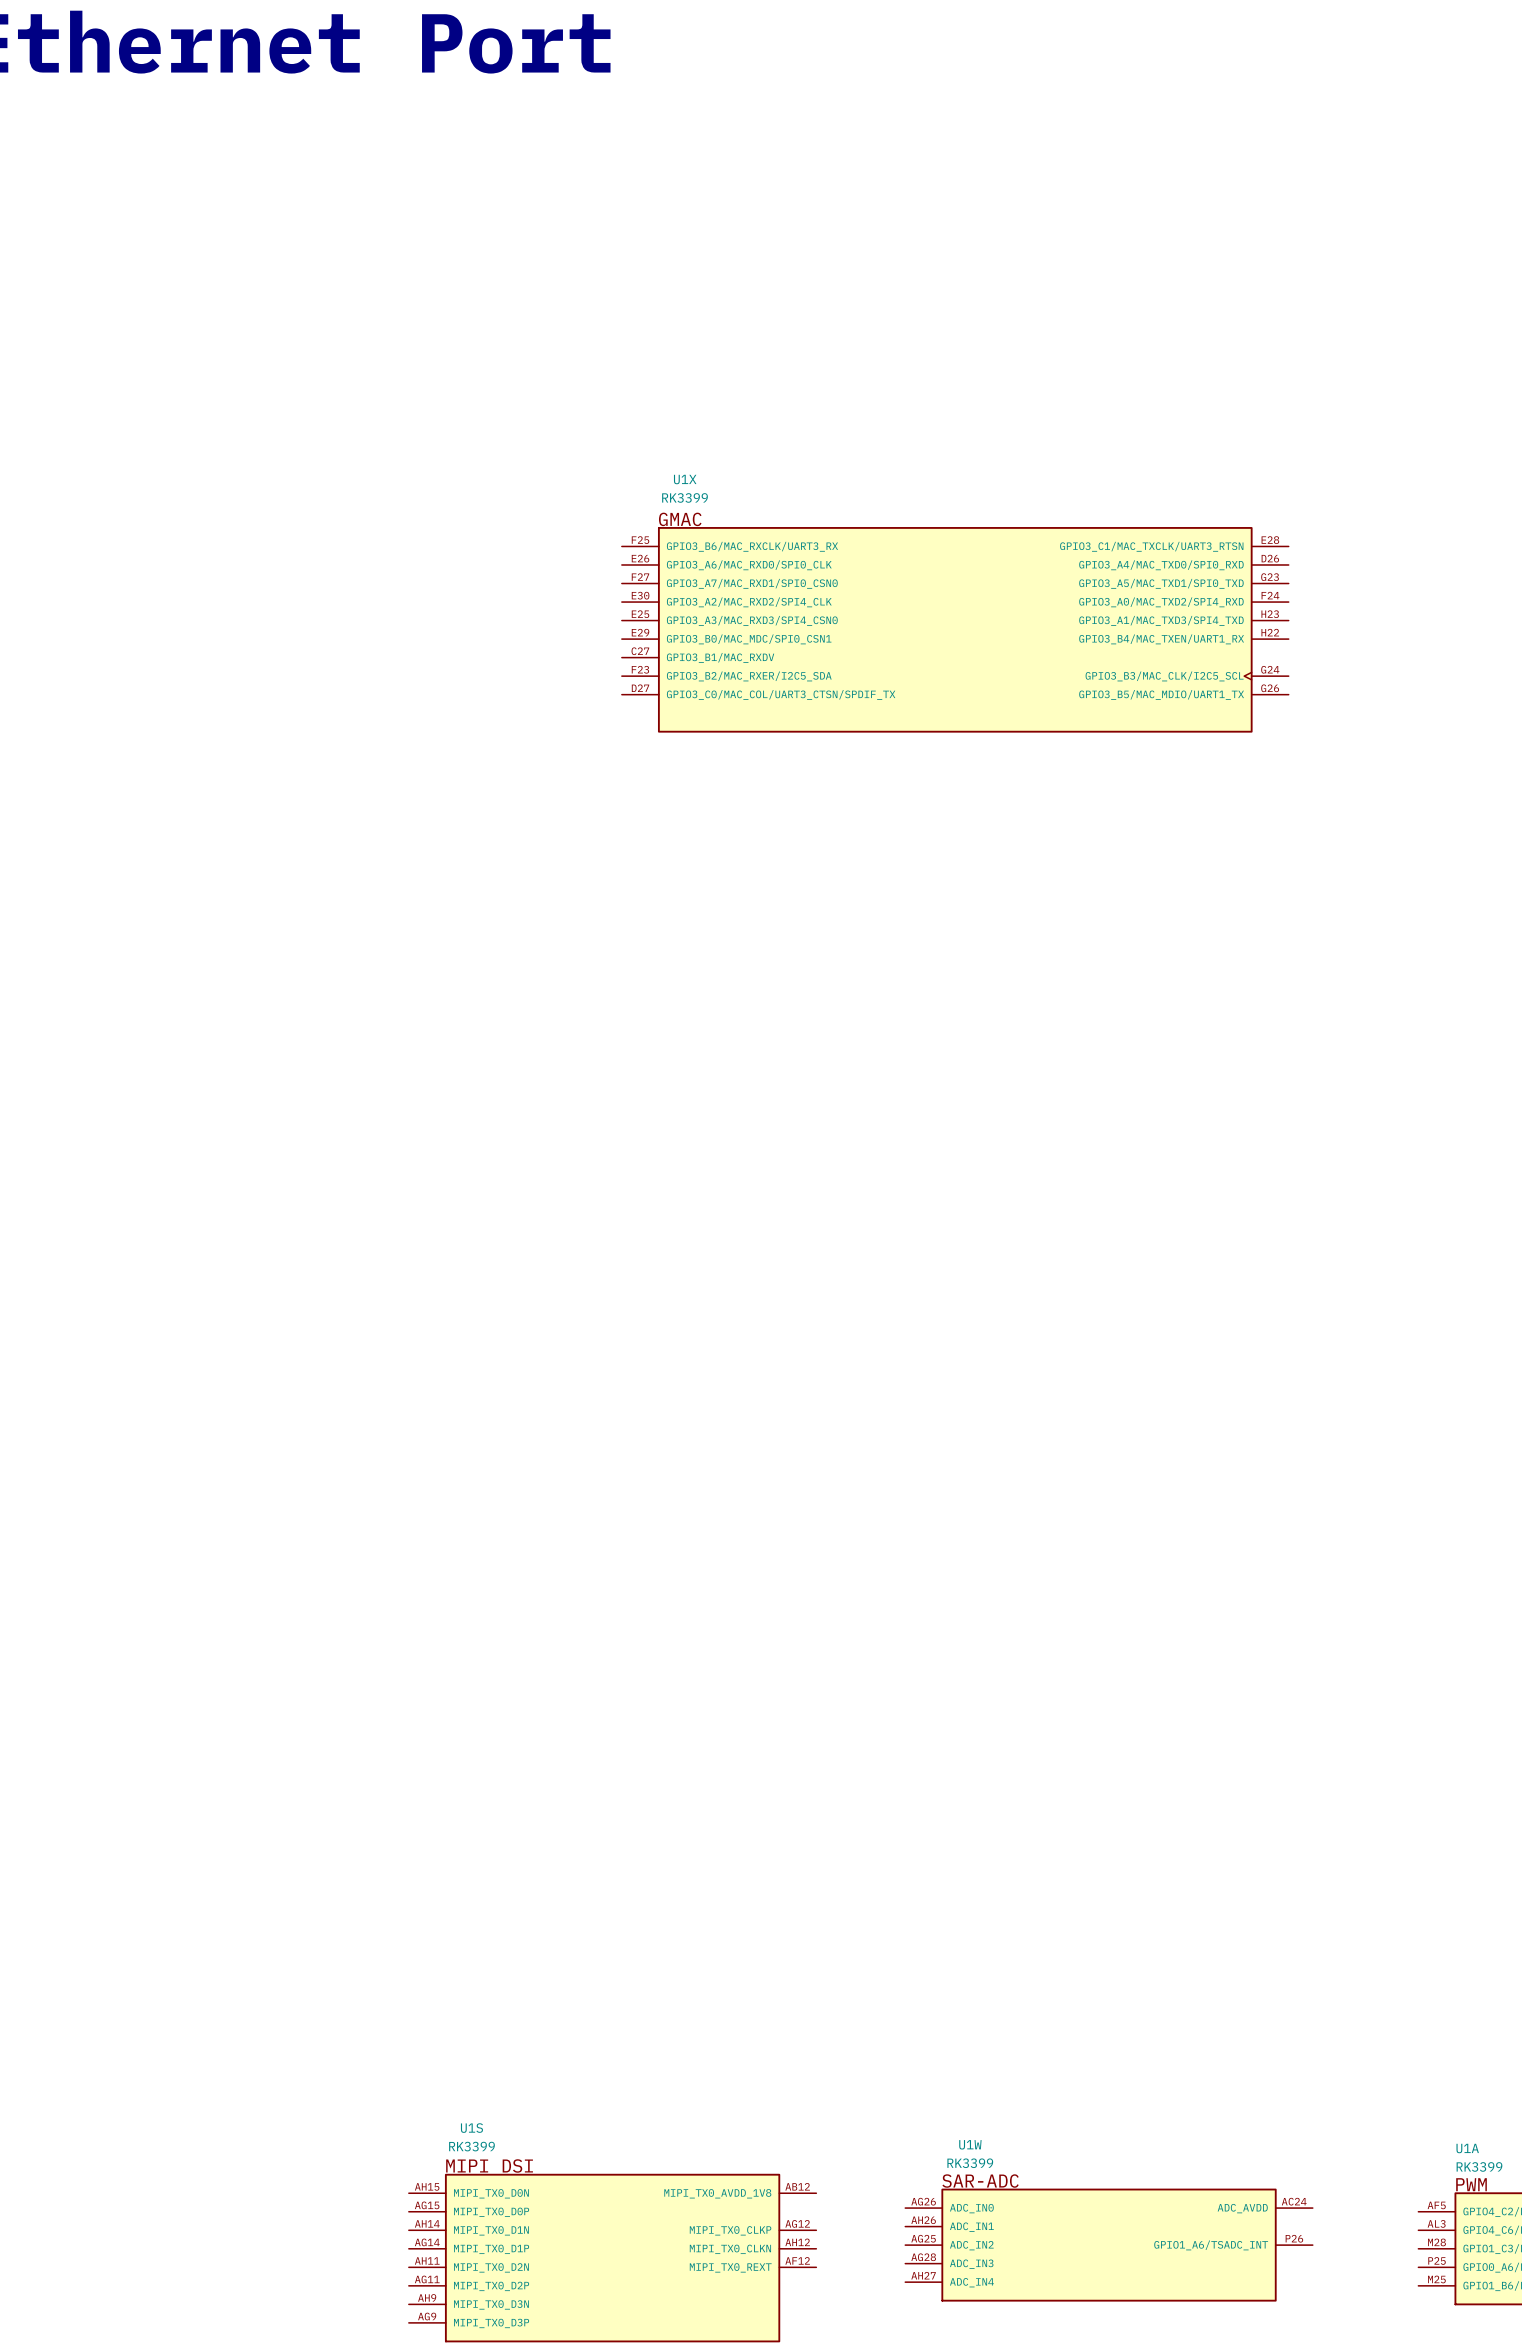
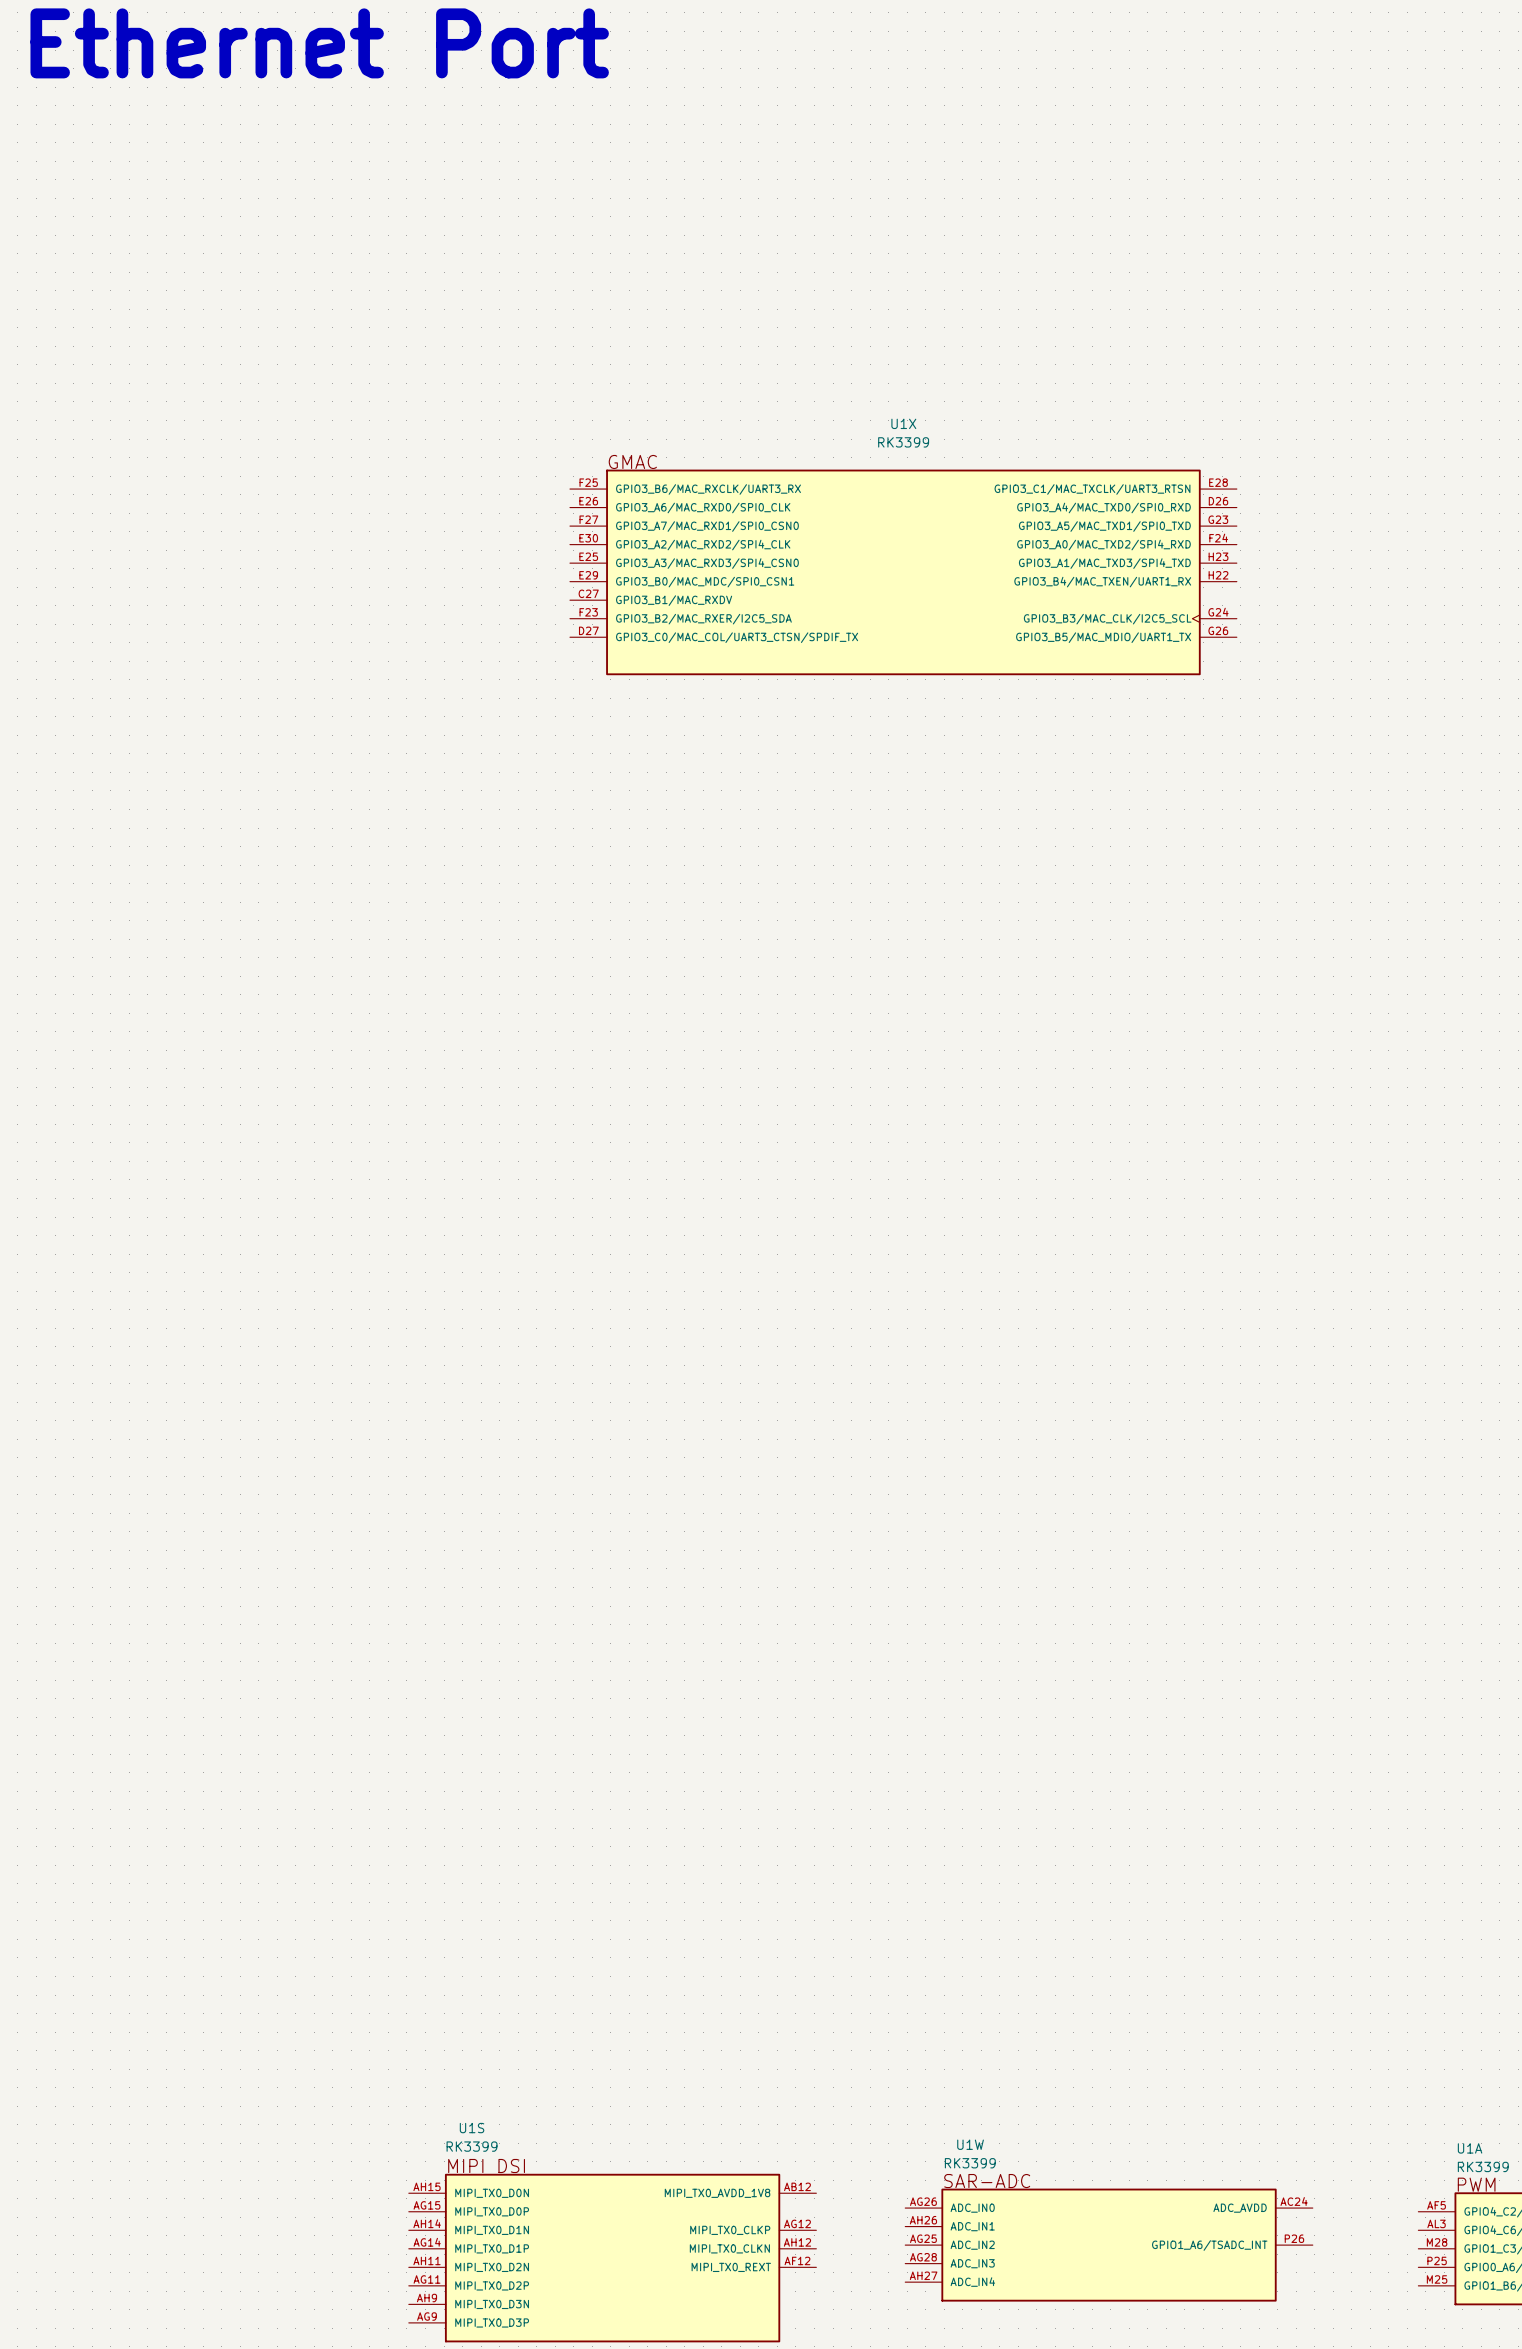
U1X name position: U1X (685, 479) -> U1X (903, 423)
U1X value position: RK3399 (685, 497) -> RK3399 (903, 442)
U1X position: (955, 629) -> (903, 572)

